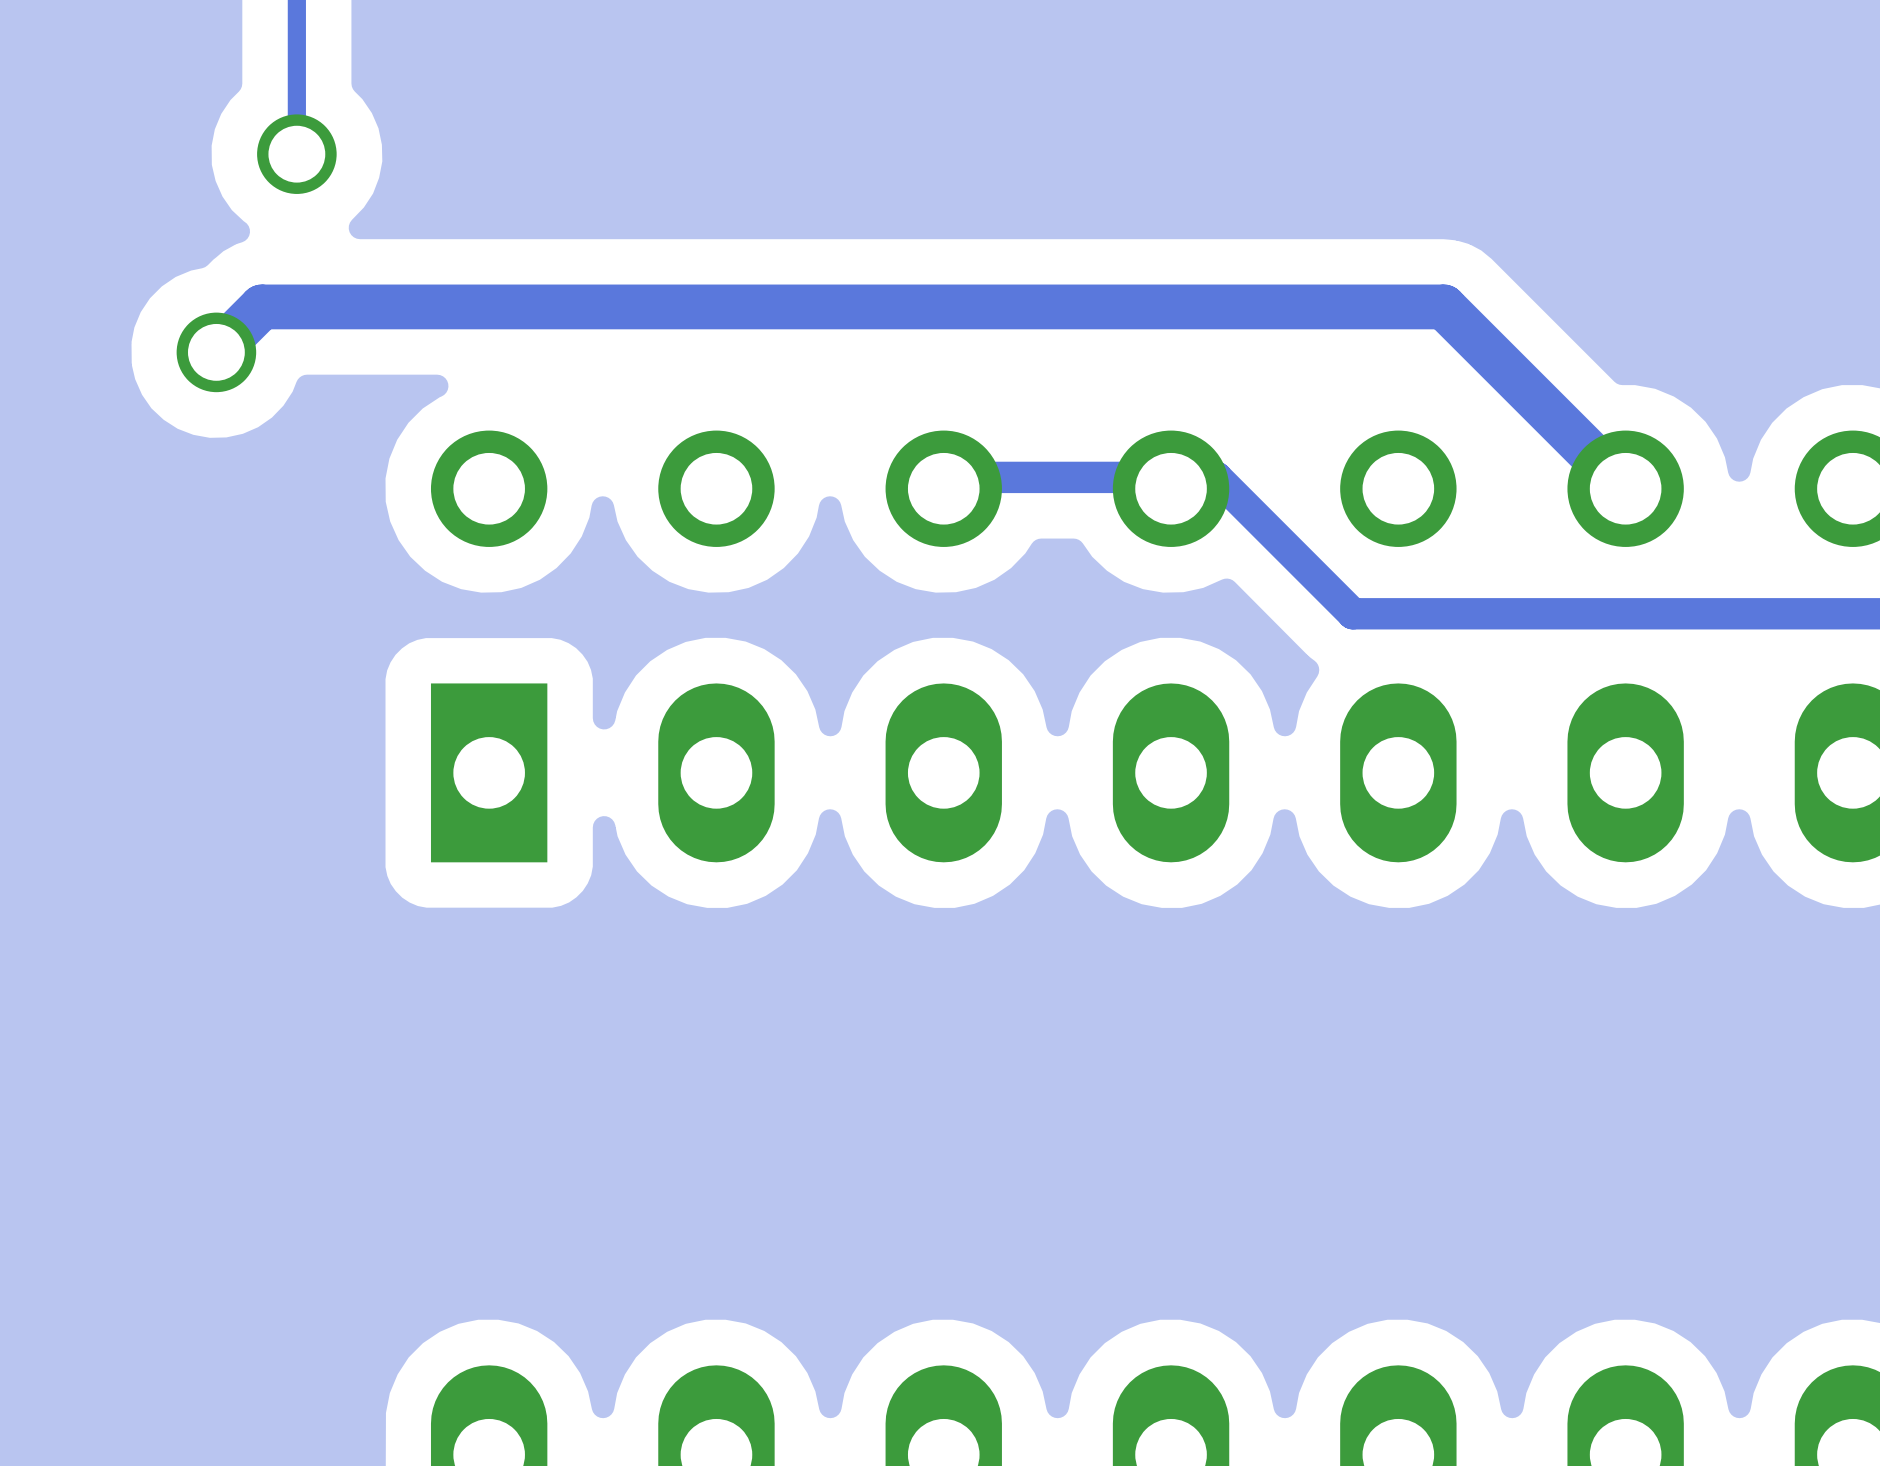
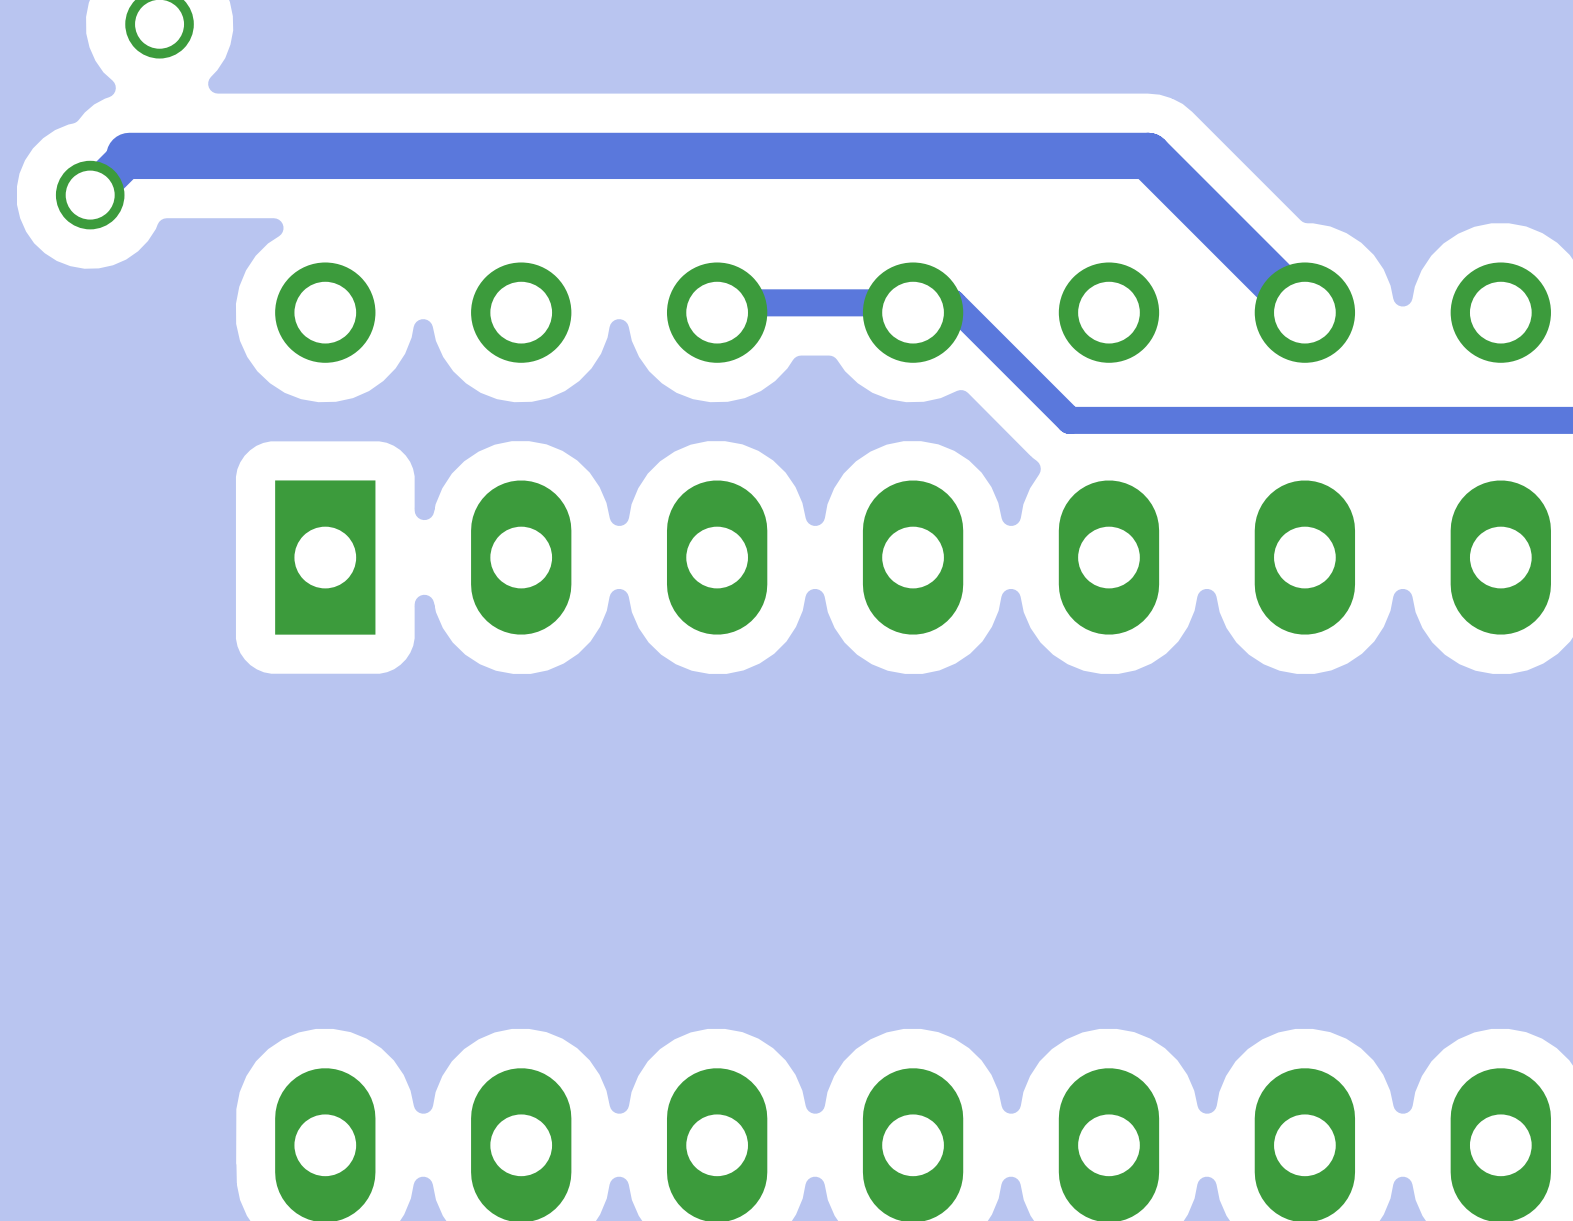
track width: thin (261, 306) (1443, 306) (1625, 488) -> thick (129, 155) (1148, 155) (1304, 312)

